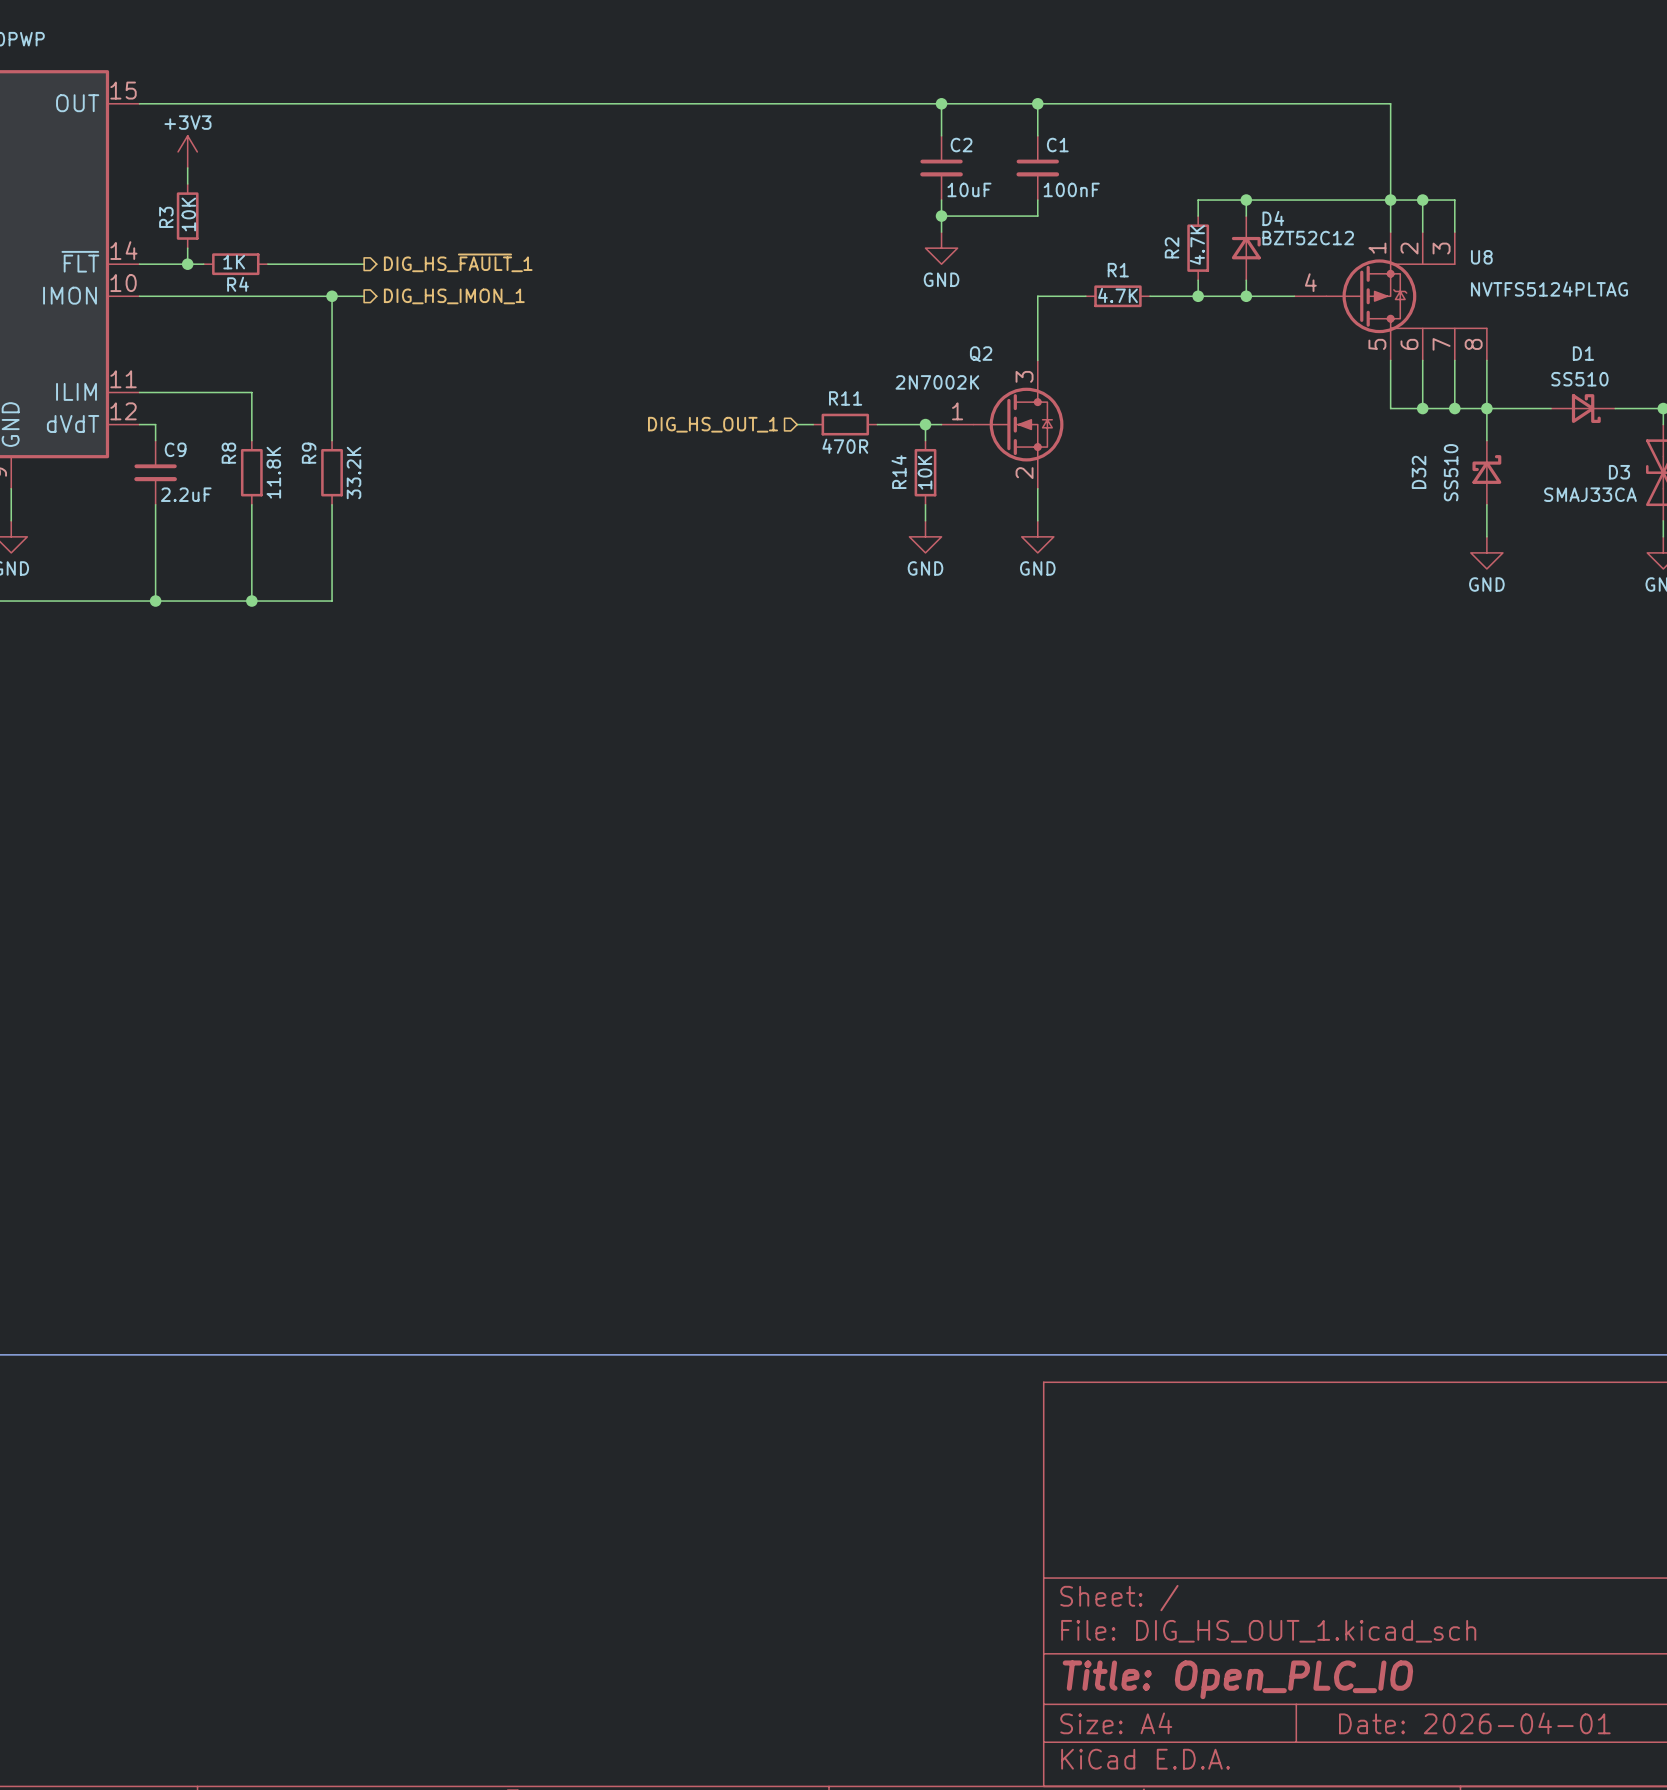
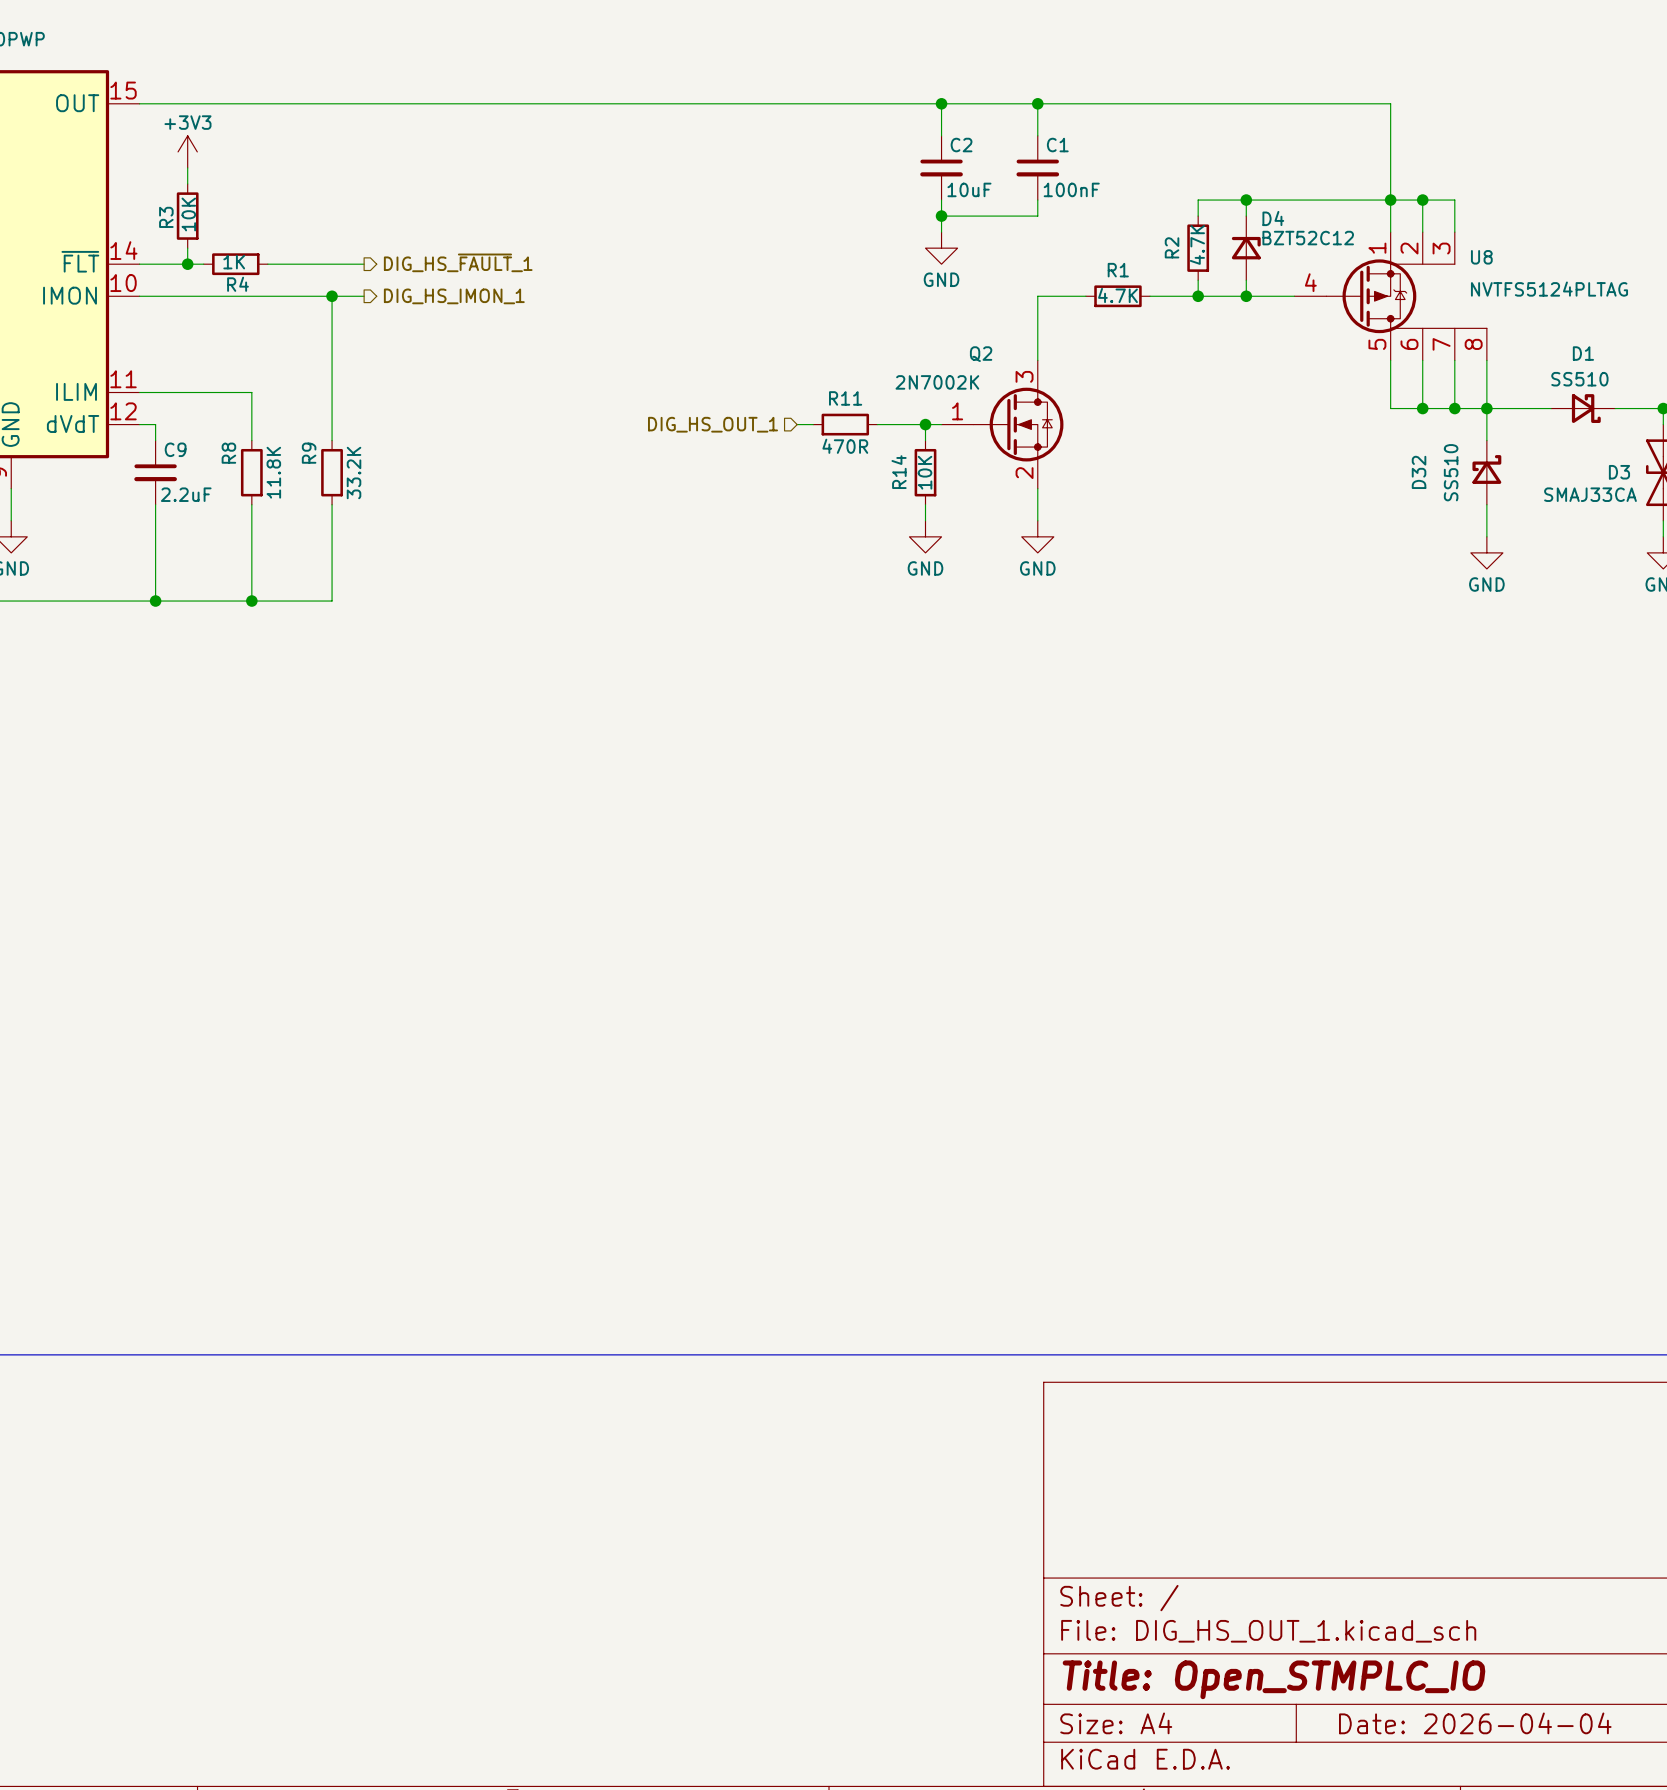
title block: Title: Open_PLC_IO (1237, 1679) -> Title: Open_STMPLC_IO (1273, 1679)
title block: Date: 2026-04-01 (1474, 1723) -> Date: 2026-04-04 (1475, 1723)

